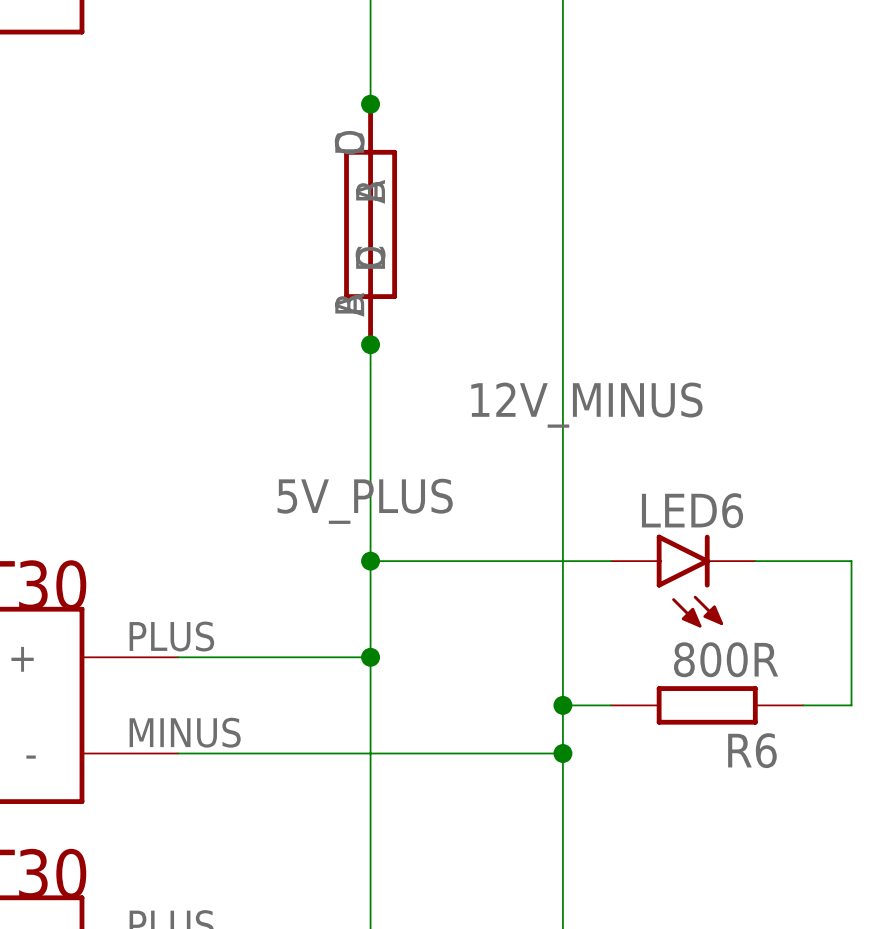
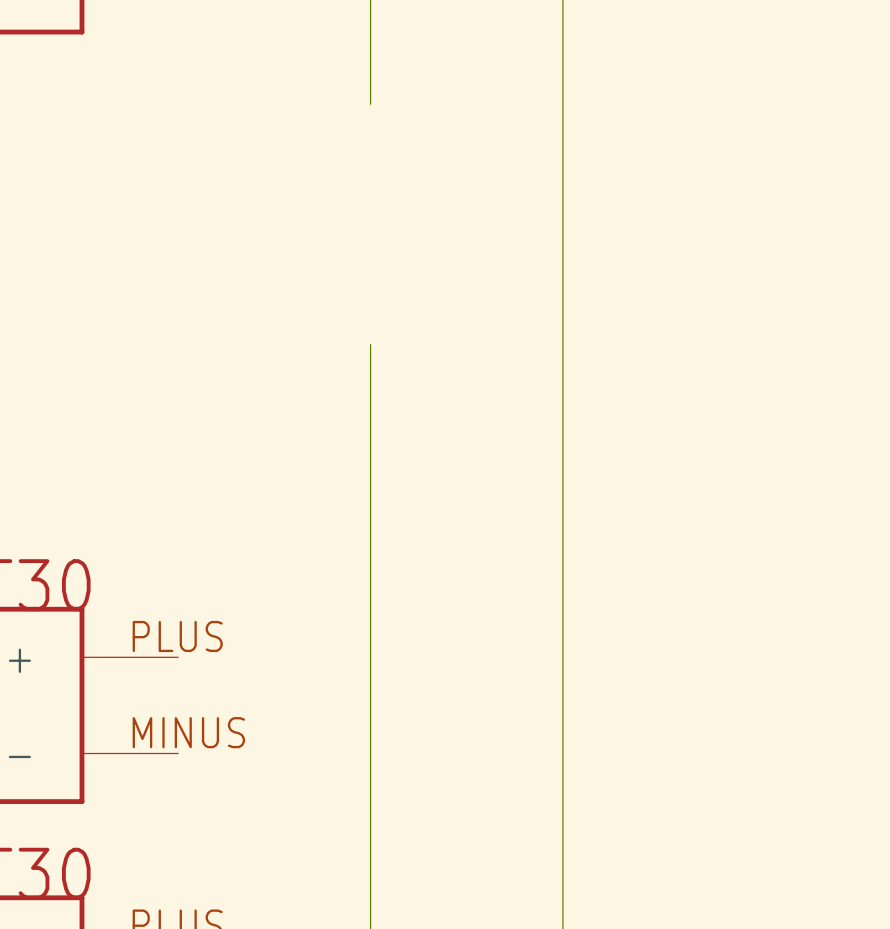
junction: (370, 104) -> none
part: (370, 224) -> none
junction: (370, 344) -> none
label: 12V_MINUS (586, 405) -> none
label: 5V_PLUS (365, 501) -> none
wire: (370, 561) (611, 561) -> none
junction: (370, 561) -> none
wire: (755, 561) (851, 561) (851, 705) (803, 705) -> none
LED6: (683, 581) -> none
wire: (178, 657) (370, 657) -> none
junction: (370, 657) -> none
wire: (562, 705) (611, 705) -> none
junction: (562, 705) -> none
R6: 800R (707, 705) -> none
wire: (178, 753) (562, 753) -> none
junction: (562, 753) -> none

